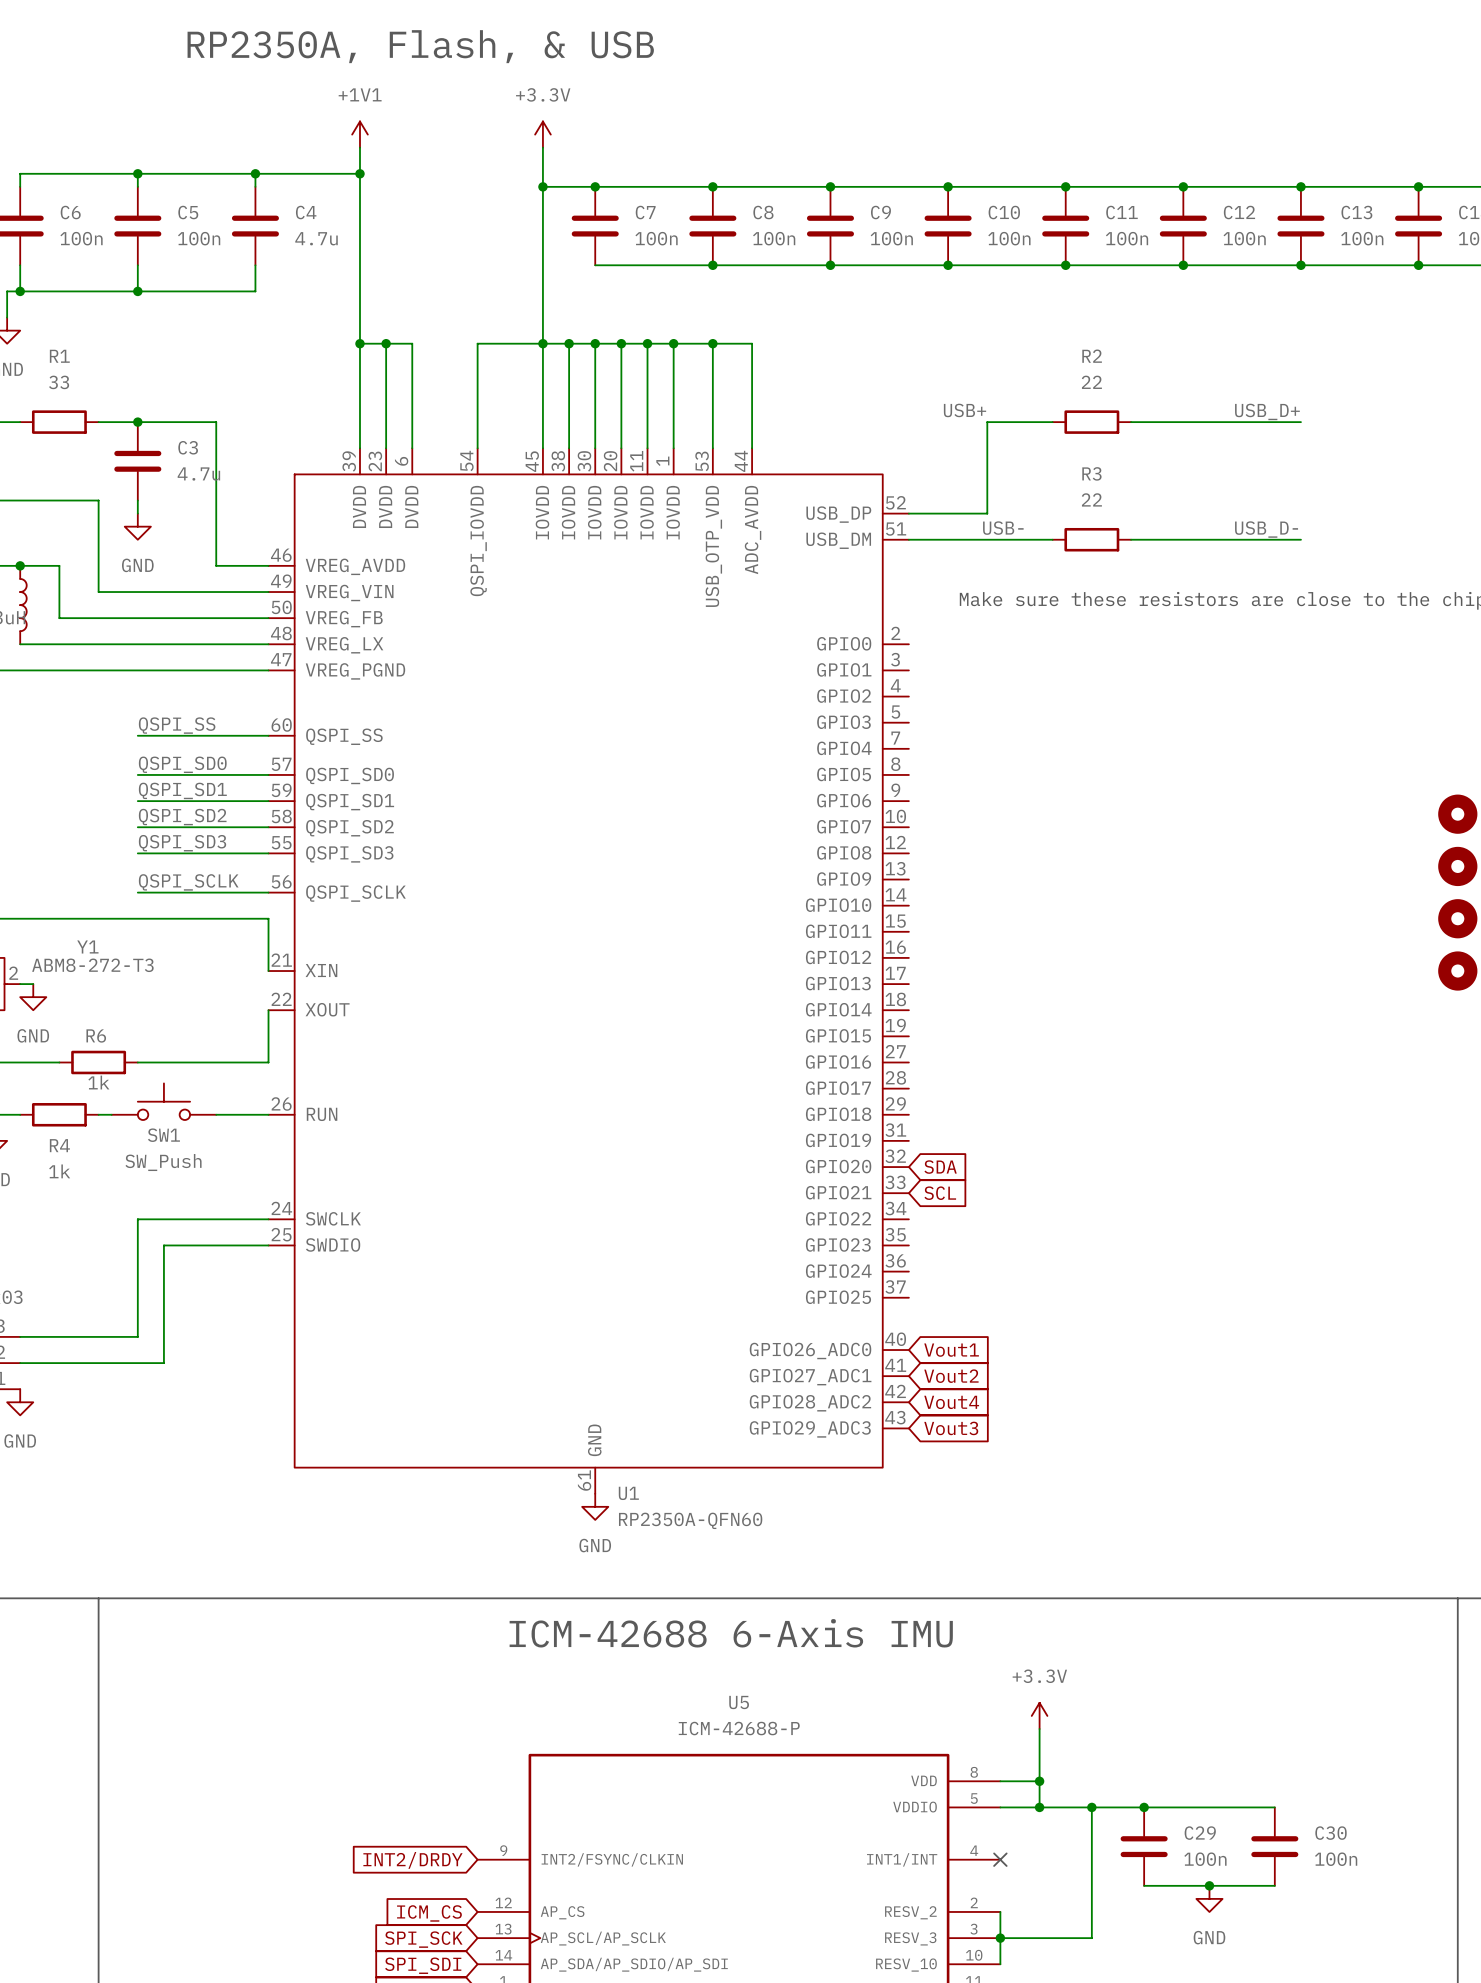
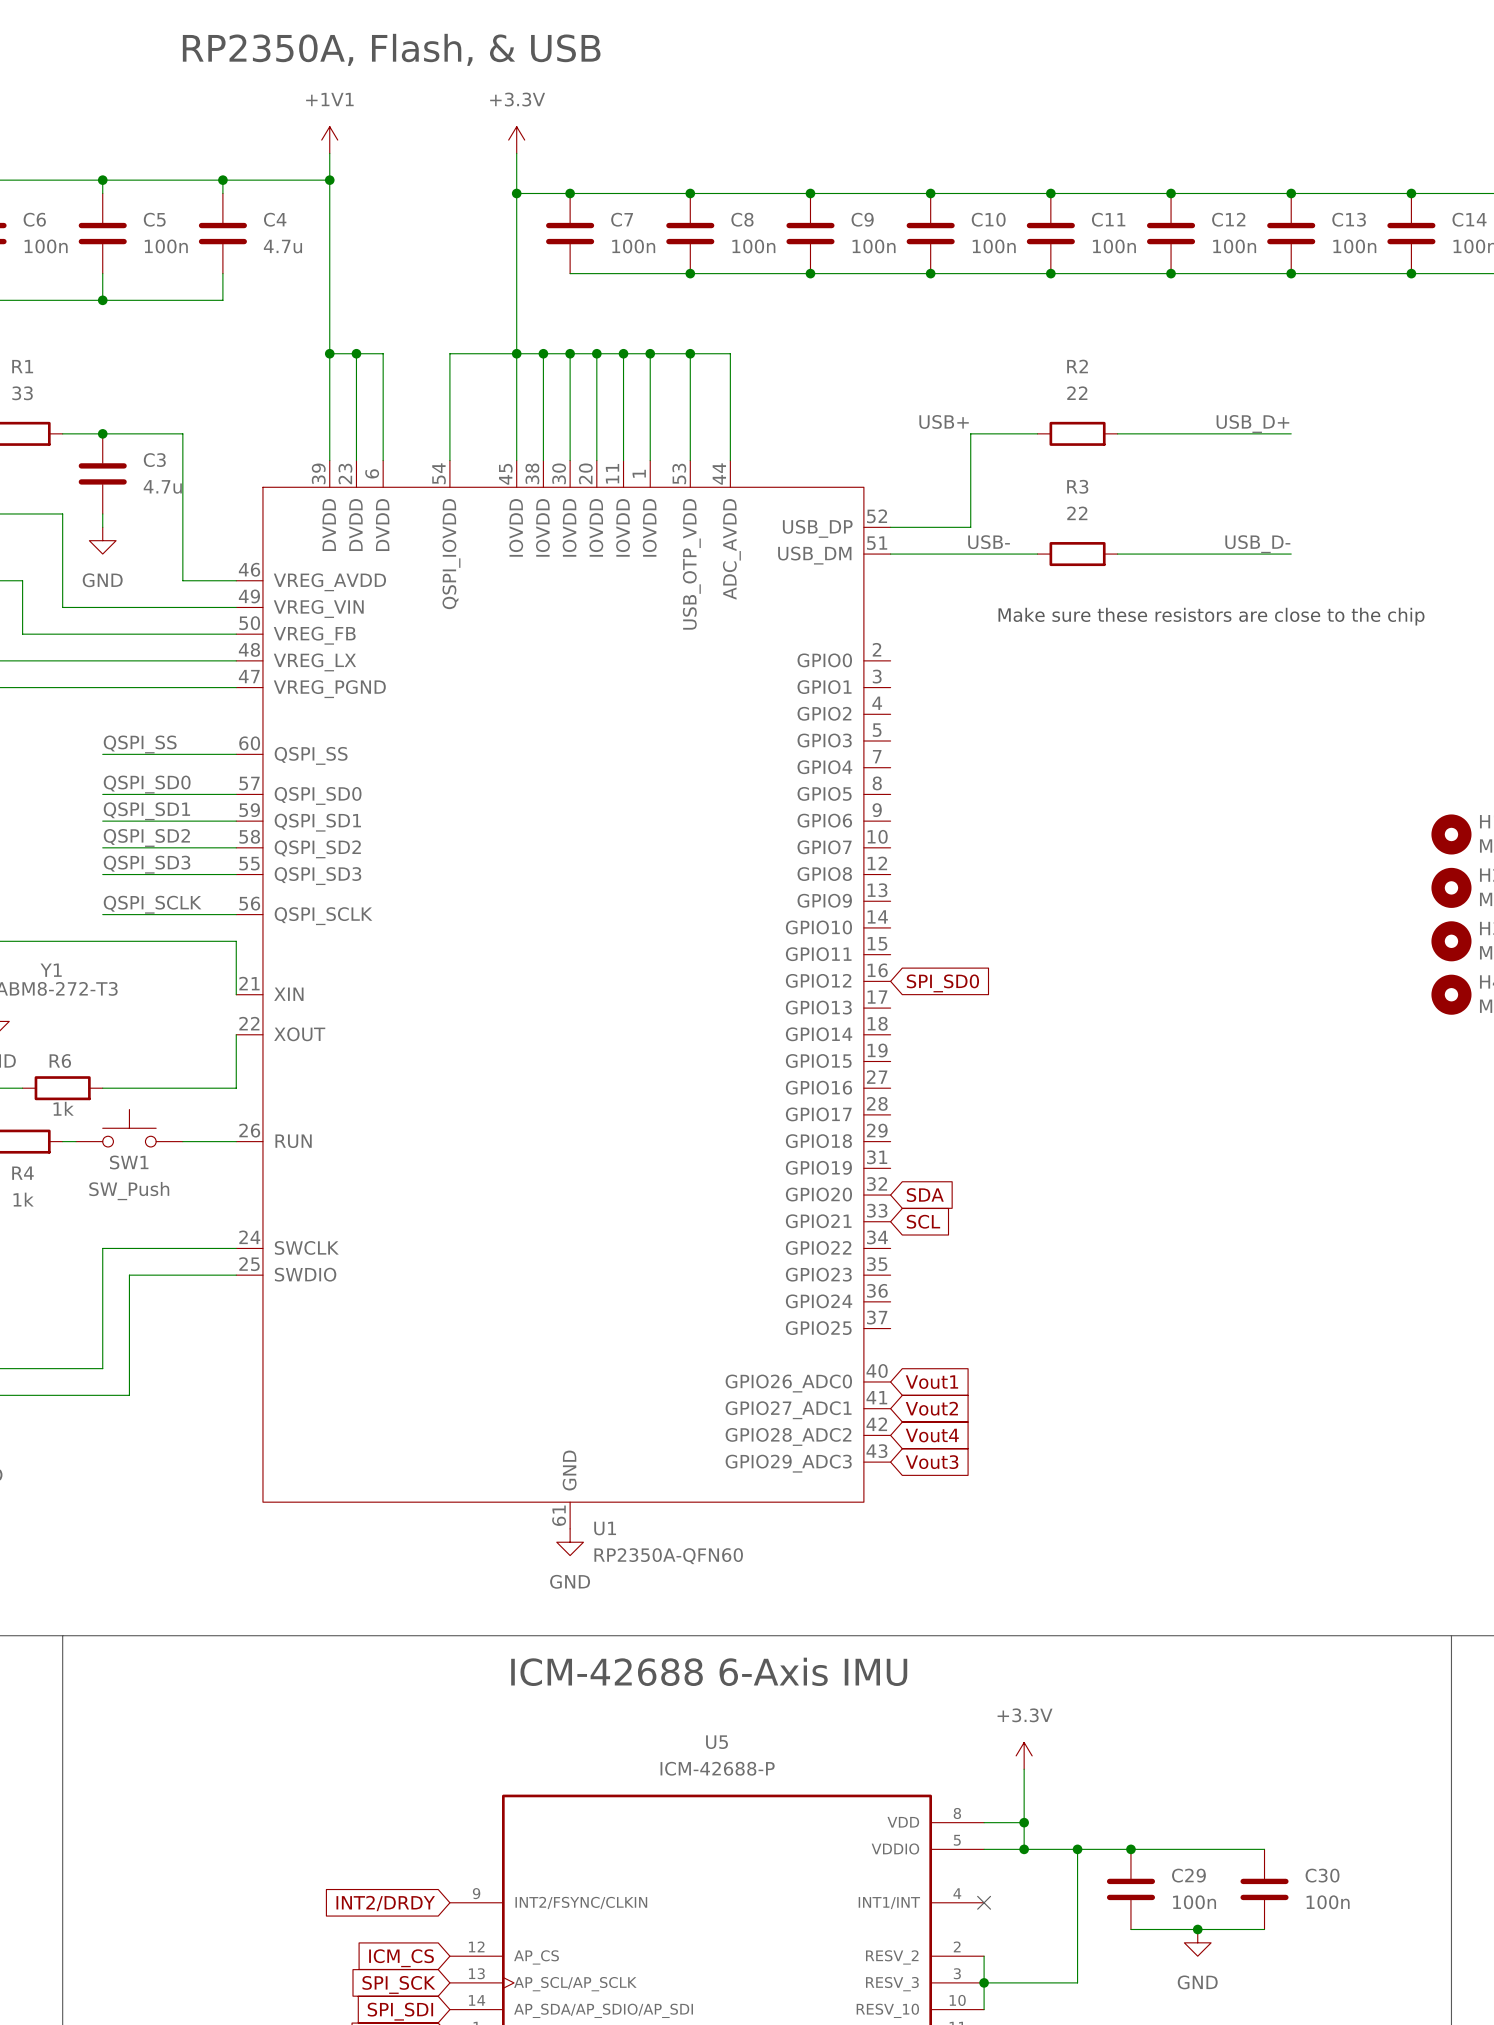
global label: none -> SPI_SD0 (942, 983)

